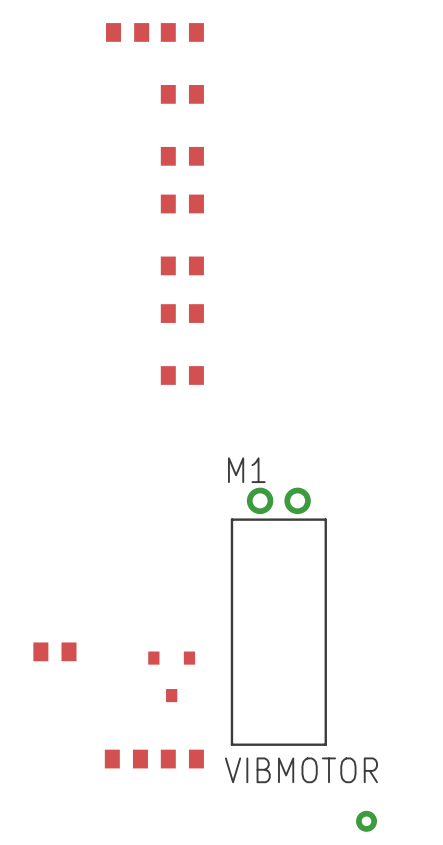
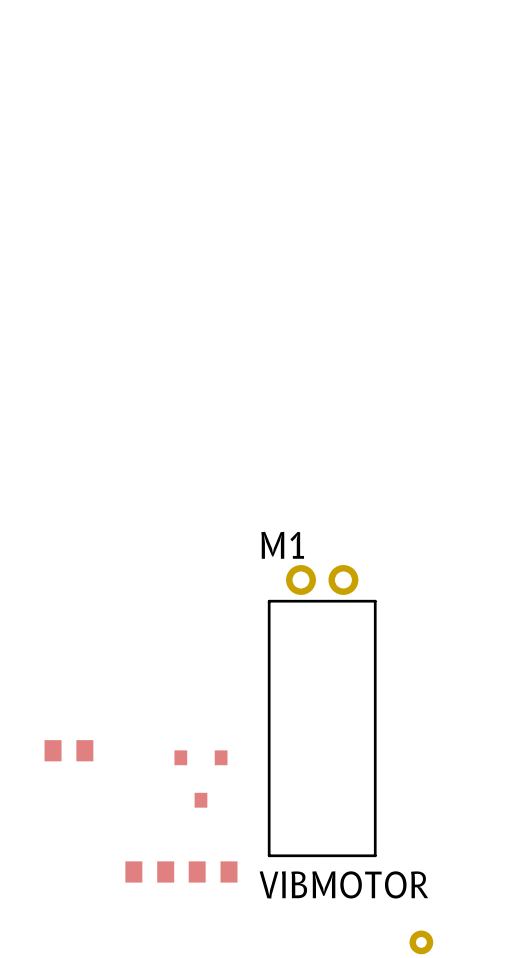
part: (127, 32) -> none
part: (182, 32) -> none
part: (182, 94) -> none
part: (182, 156) -> none
part: (182, 203) -> none
part: (182, 265) -> none
part: (182, 313) -> none
part: (182, 375) -> none

